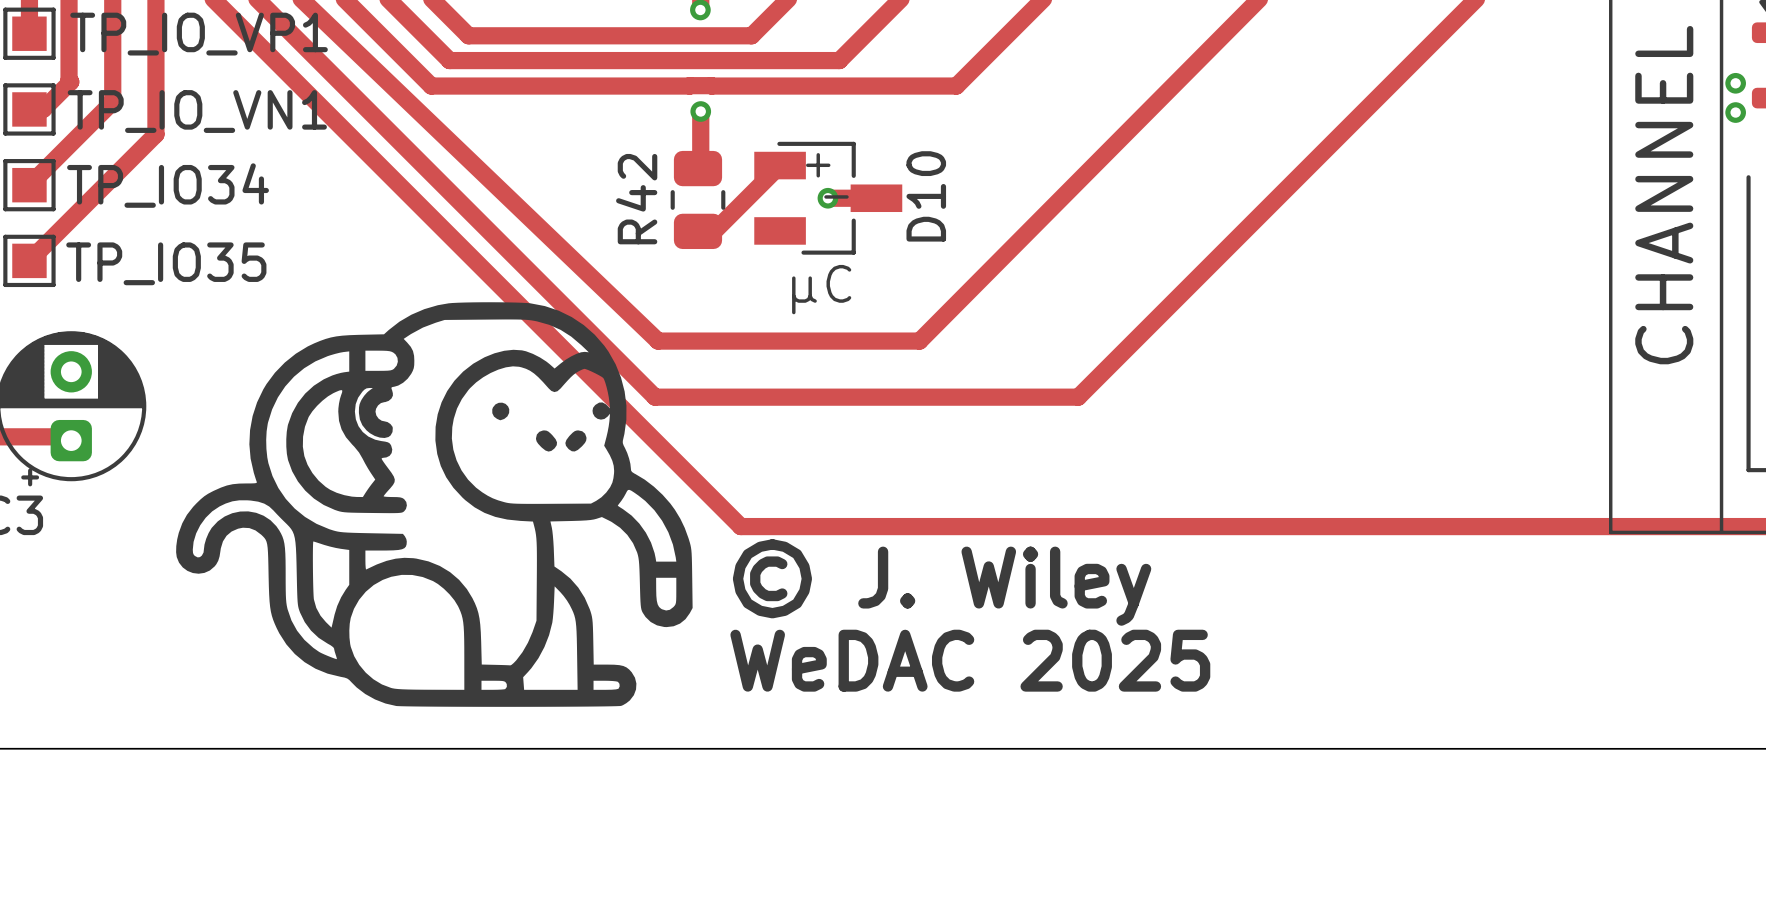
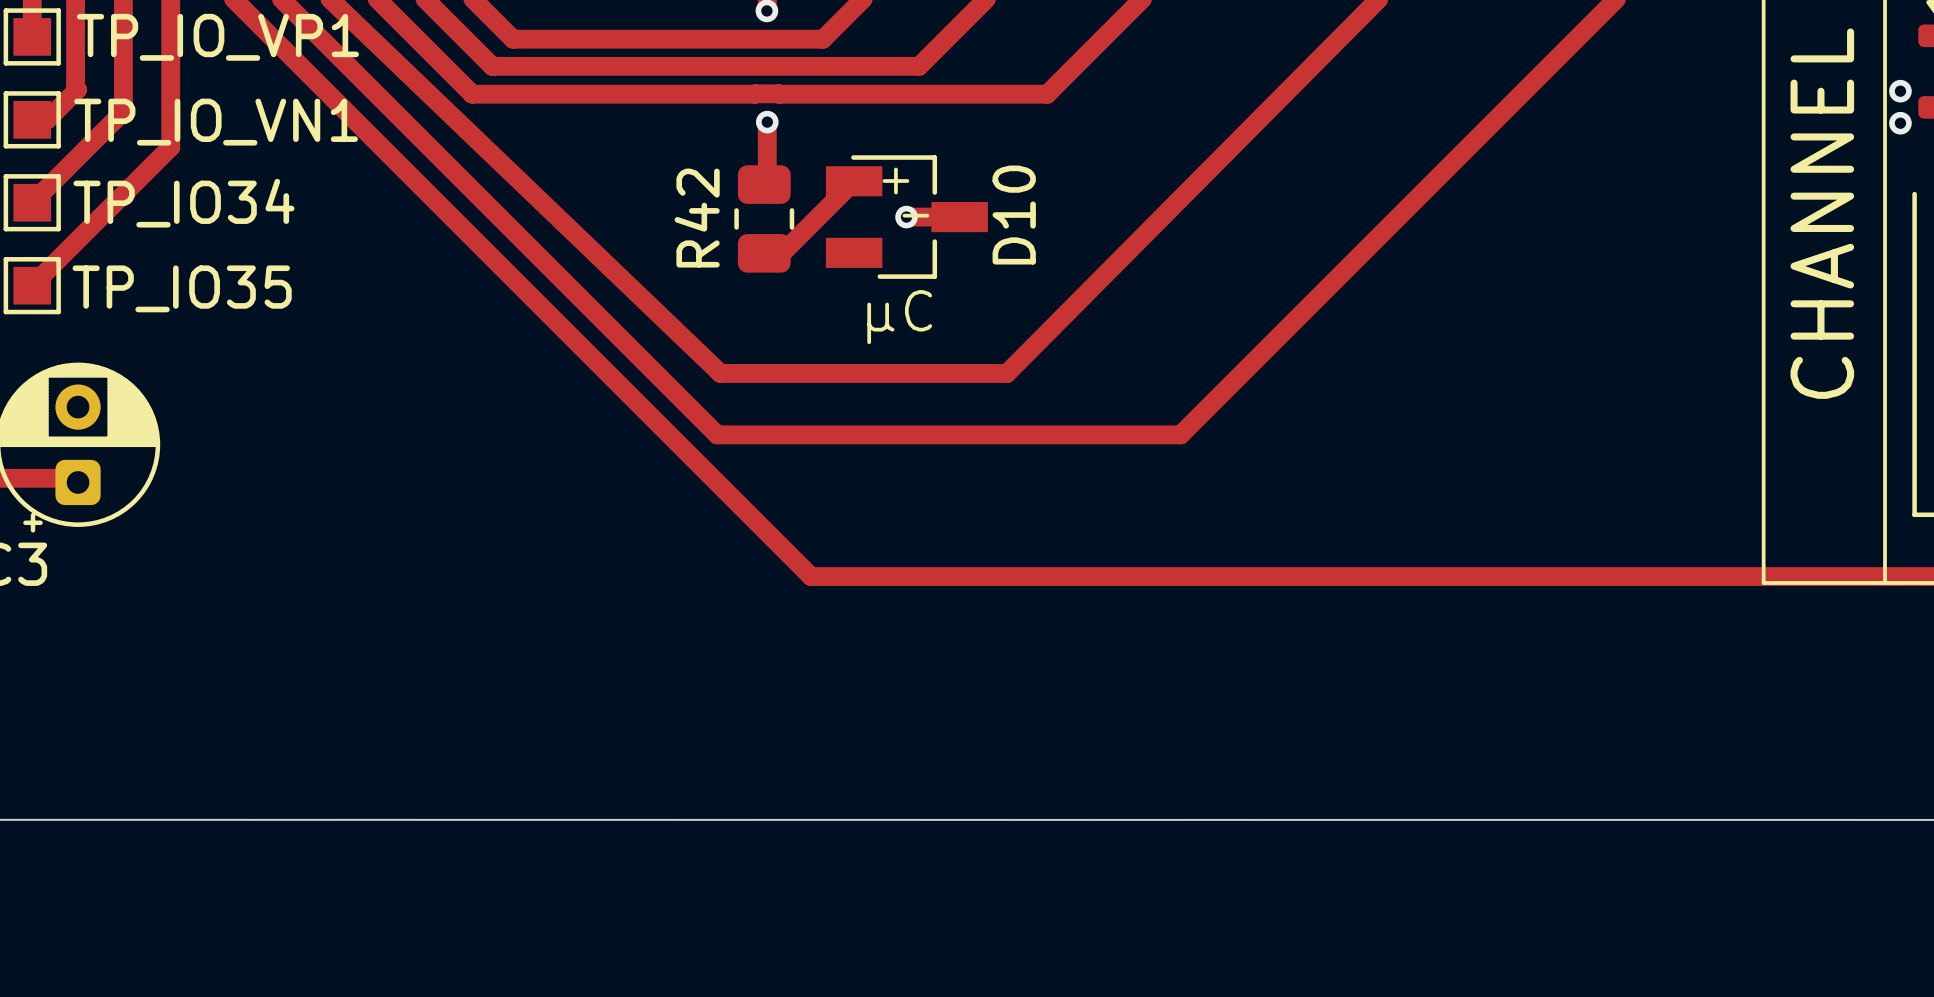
drawing: [176, 302, 693, 707] -> none
text: © J. Wiley (942, 582) -> none
text: WeDAC 2025 (970, 660) -> none

